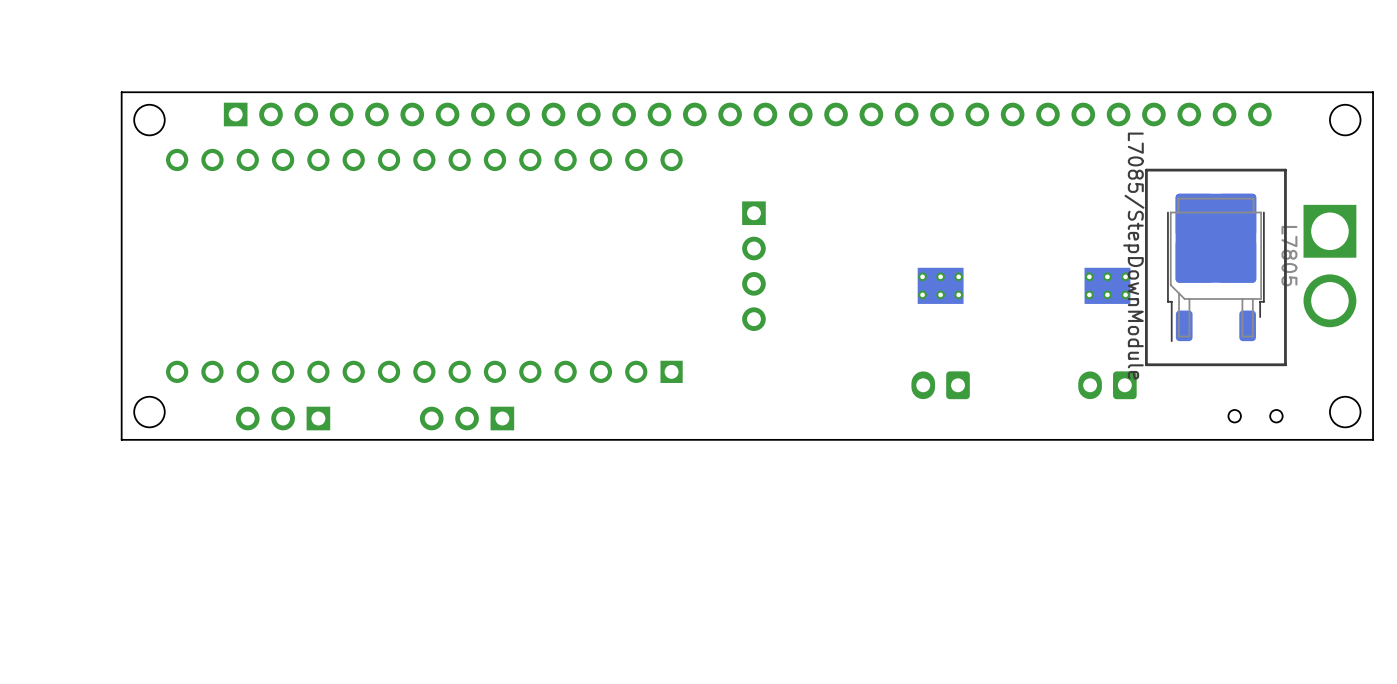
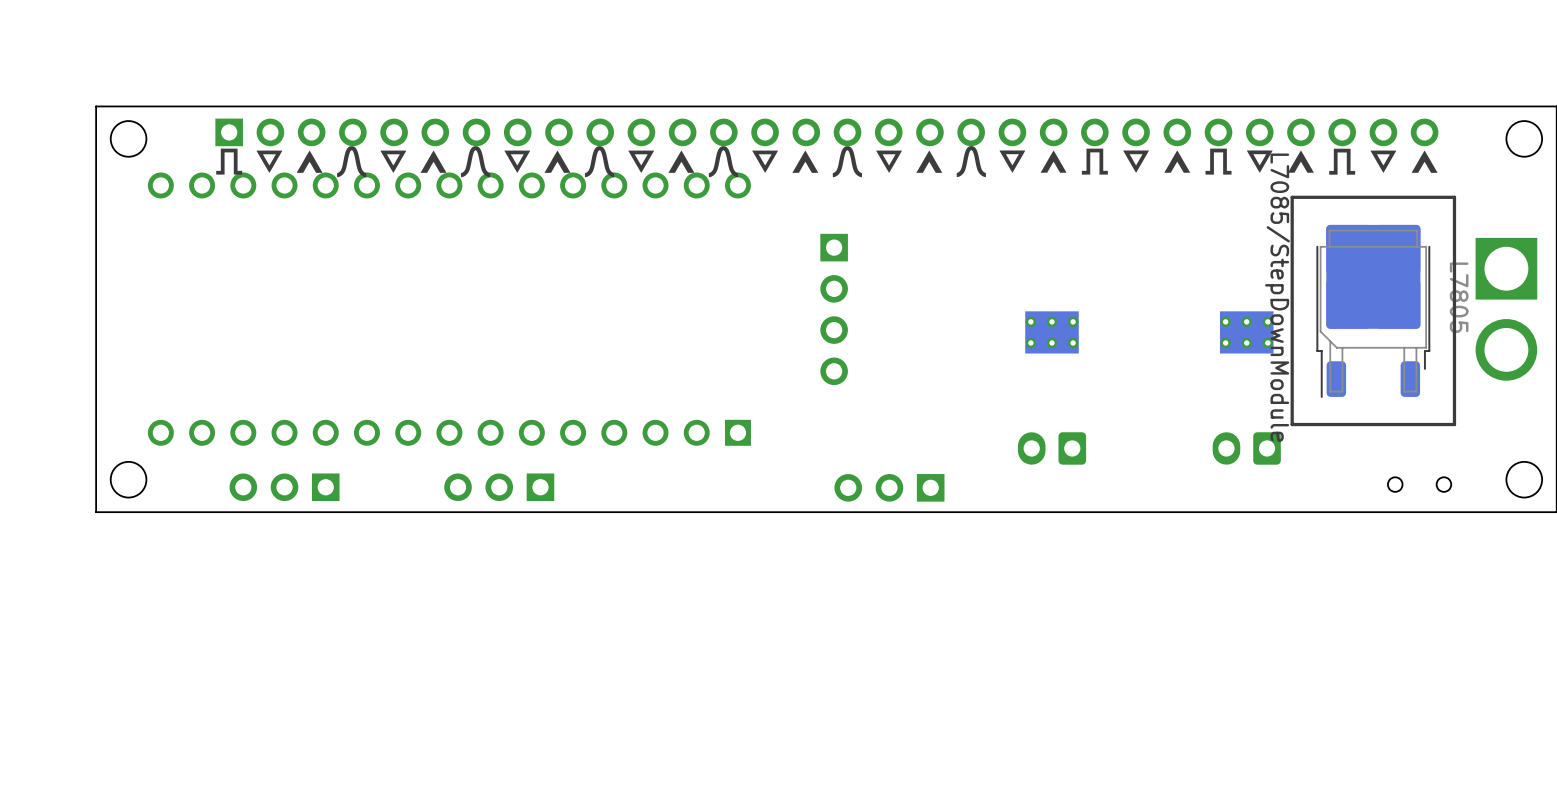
drawing: none -> [216, 146, 1438, 178]
part: none -> (889, 487)

